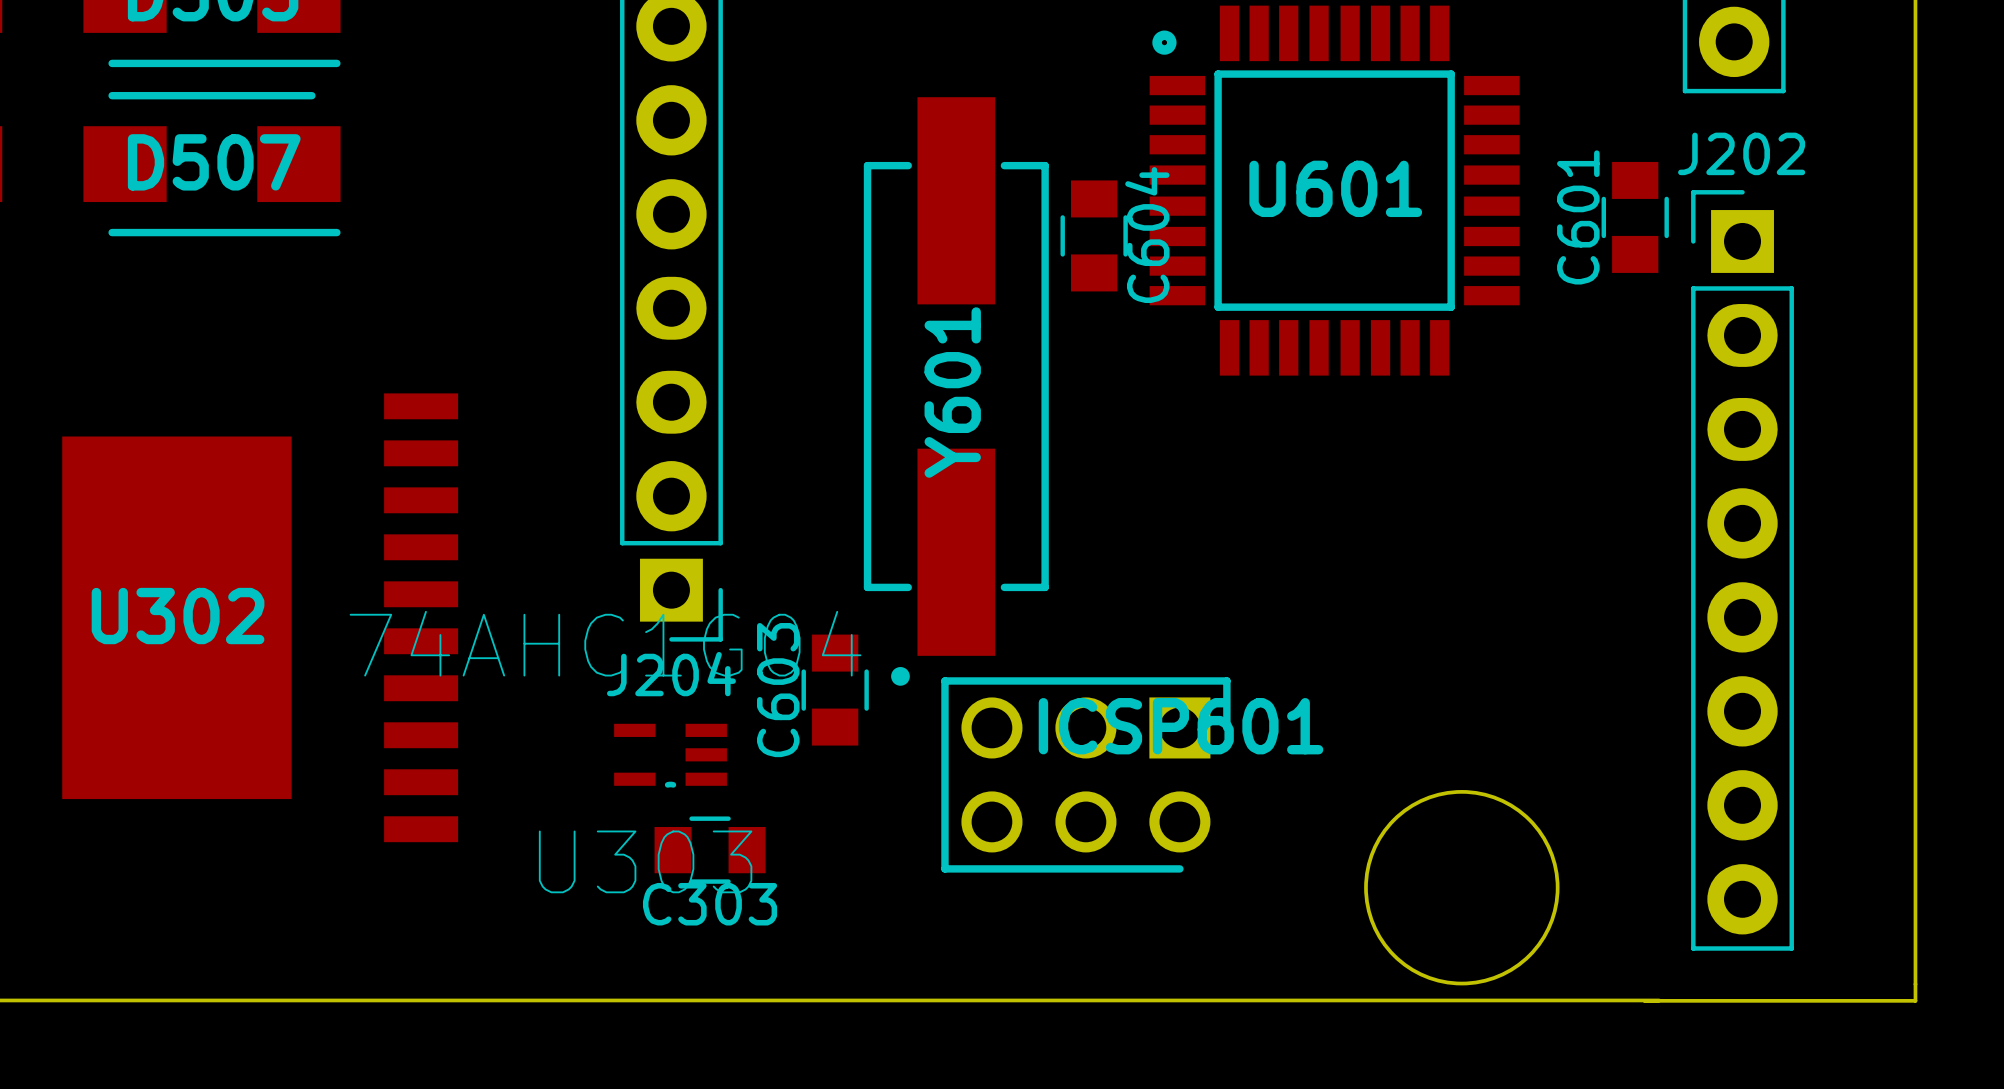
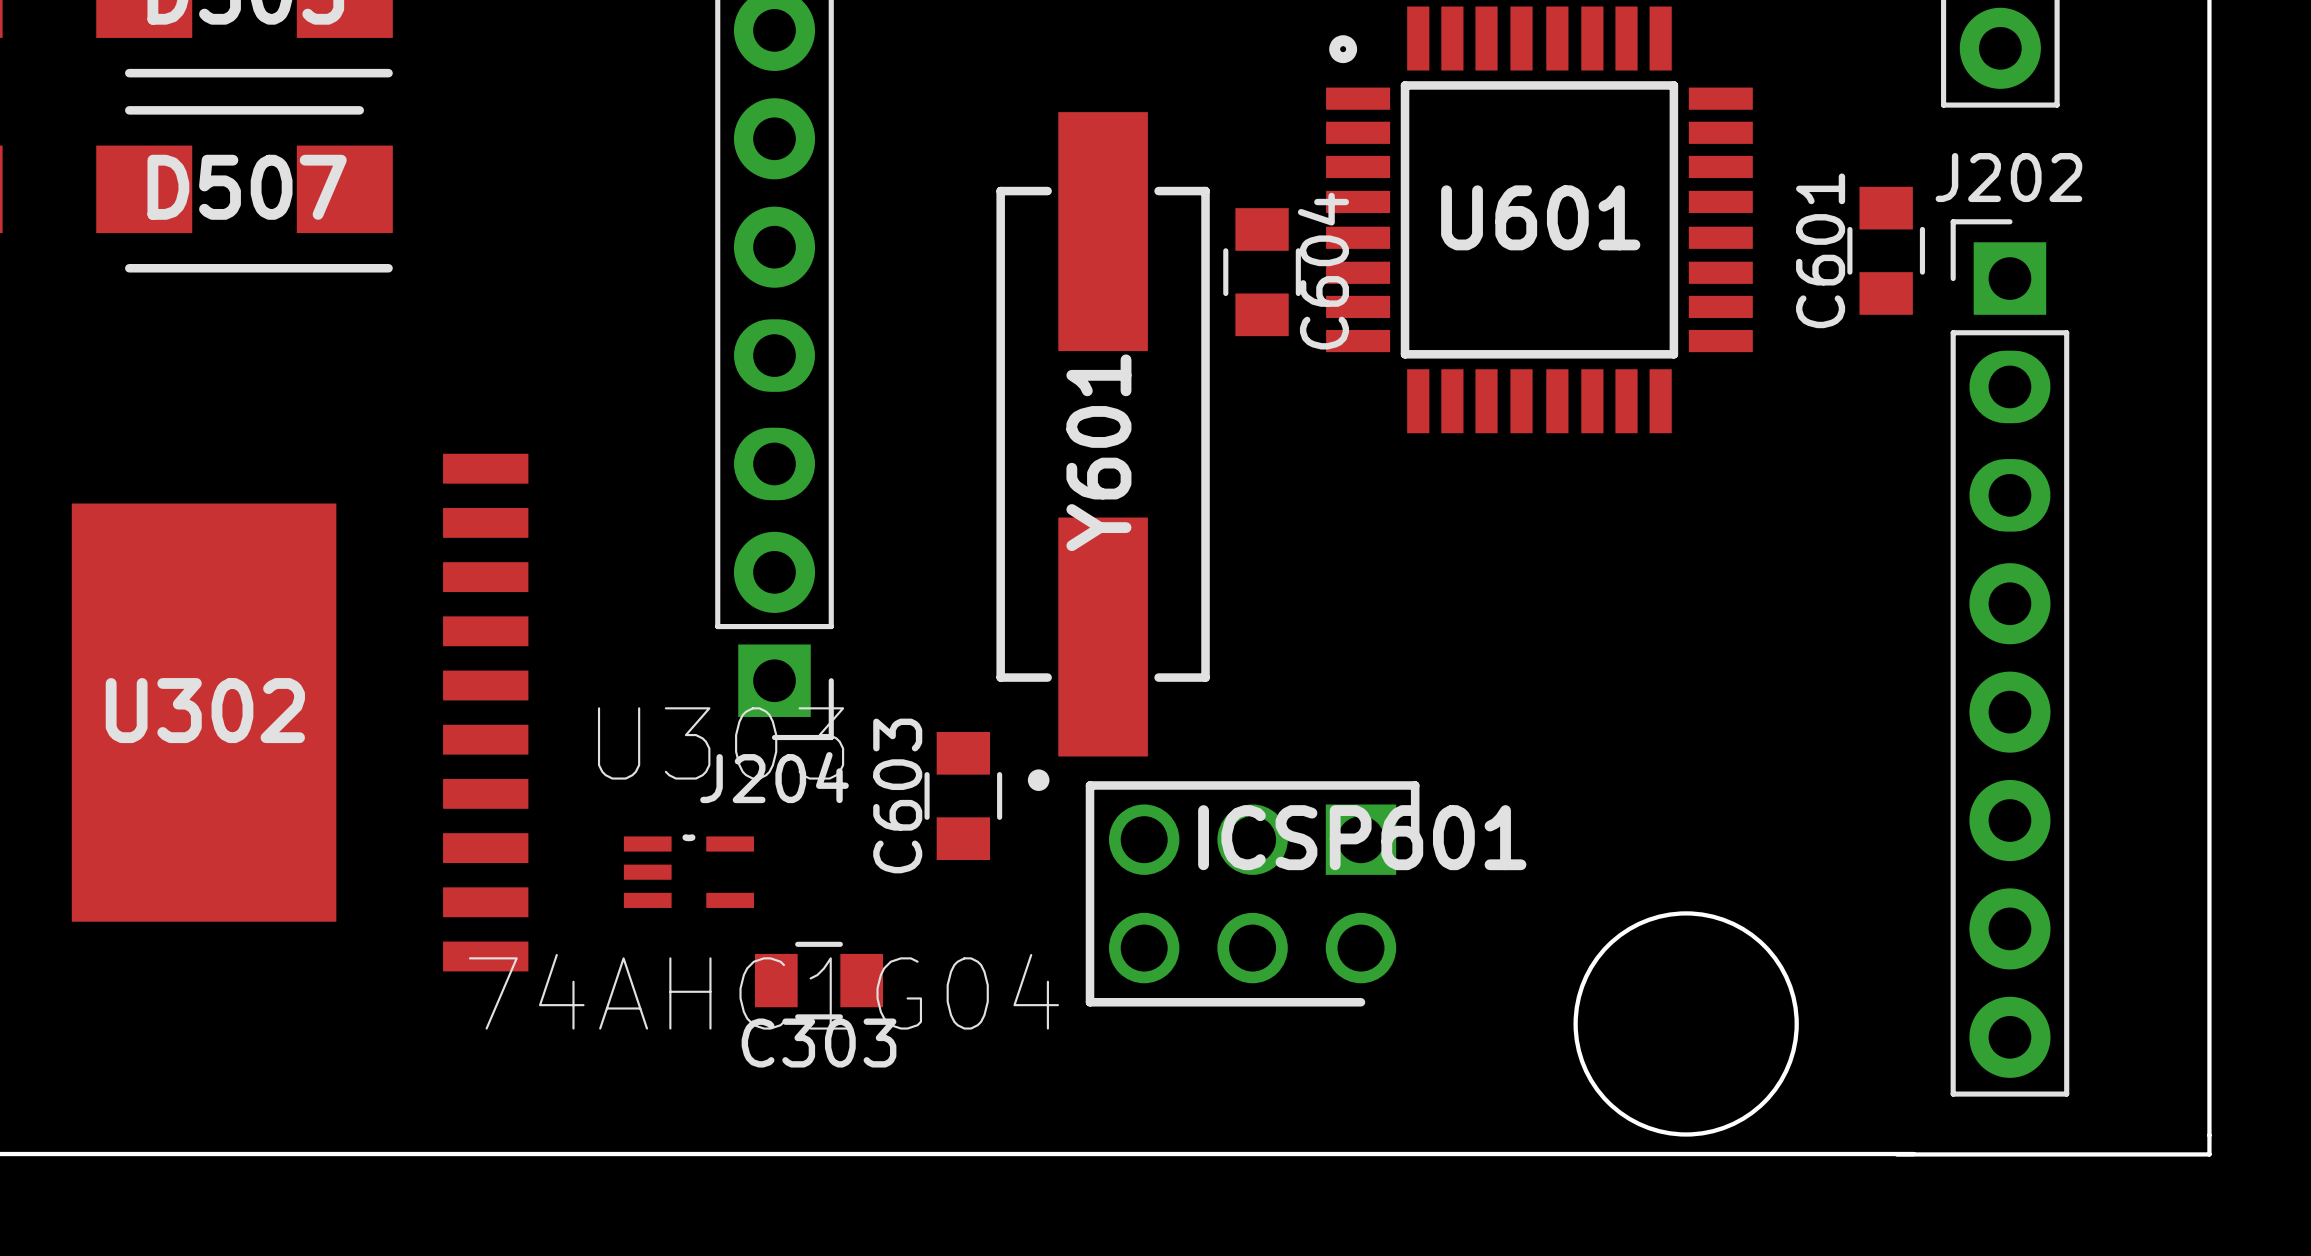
U303 rotation: 0° (670, 755) -> 180° (688, 871)
U303 position: (670, 755) -> (688, 871)

